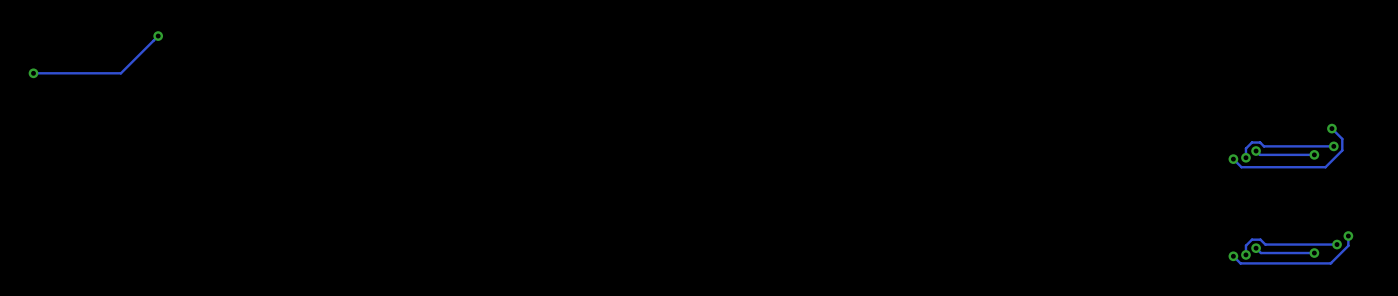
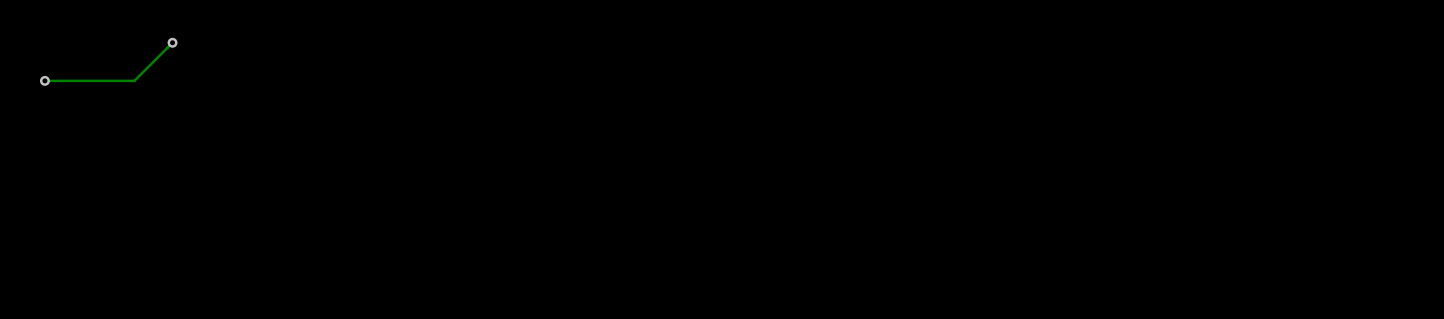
track: (1331, 128) (1342, 138) (1342, 150) (1325, 167) (1241, 167) (1233, 159) -> none
via: (1331, 128) -> none
track: (1333, 146) (1263, 146) (1260, 142) (1251, 142) (1245, 148) (1245, 157) -> none
via: (1333, 146) -> none
track: (1256, 151) (1259, 154) (1314, 154) -> none
via: (1256, 151) -> none
via: (1314, 154) -> none
via: (1245, 157) -> none
via: (1233, 159) -> none
track: (1348, 236) (1348, 245) (1330, 263) (1240, 263) (1233, 256) -> none
via: (1348, 236) -> none
track: (1337, 244) (1265, 244) (1260, 239) (1251, 239) (1245, 245) (1245, 254) -> none
via: (1337, 244) -> none
track: (1256, 248) (1260, 253) (1314, 253) -> none
via: (1256, 248) -> none
via: (1314, 253) -> none
via: (1245, 254) -> none
via: (1233, 256) -> none

